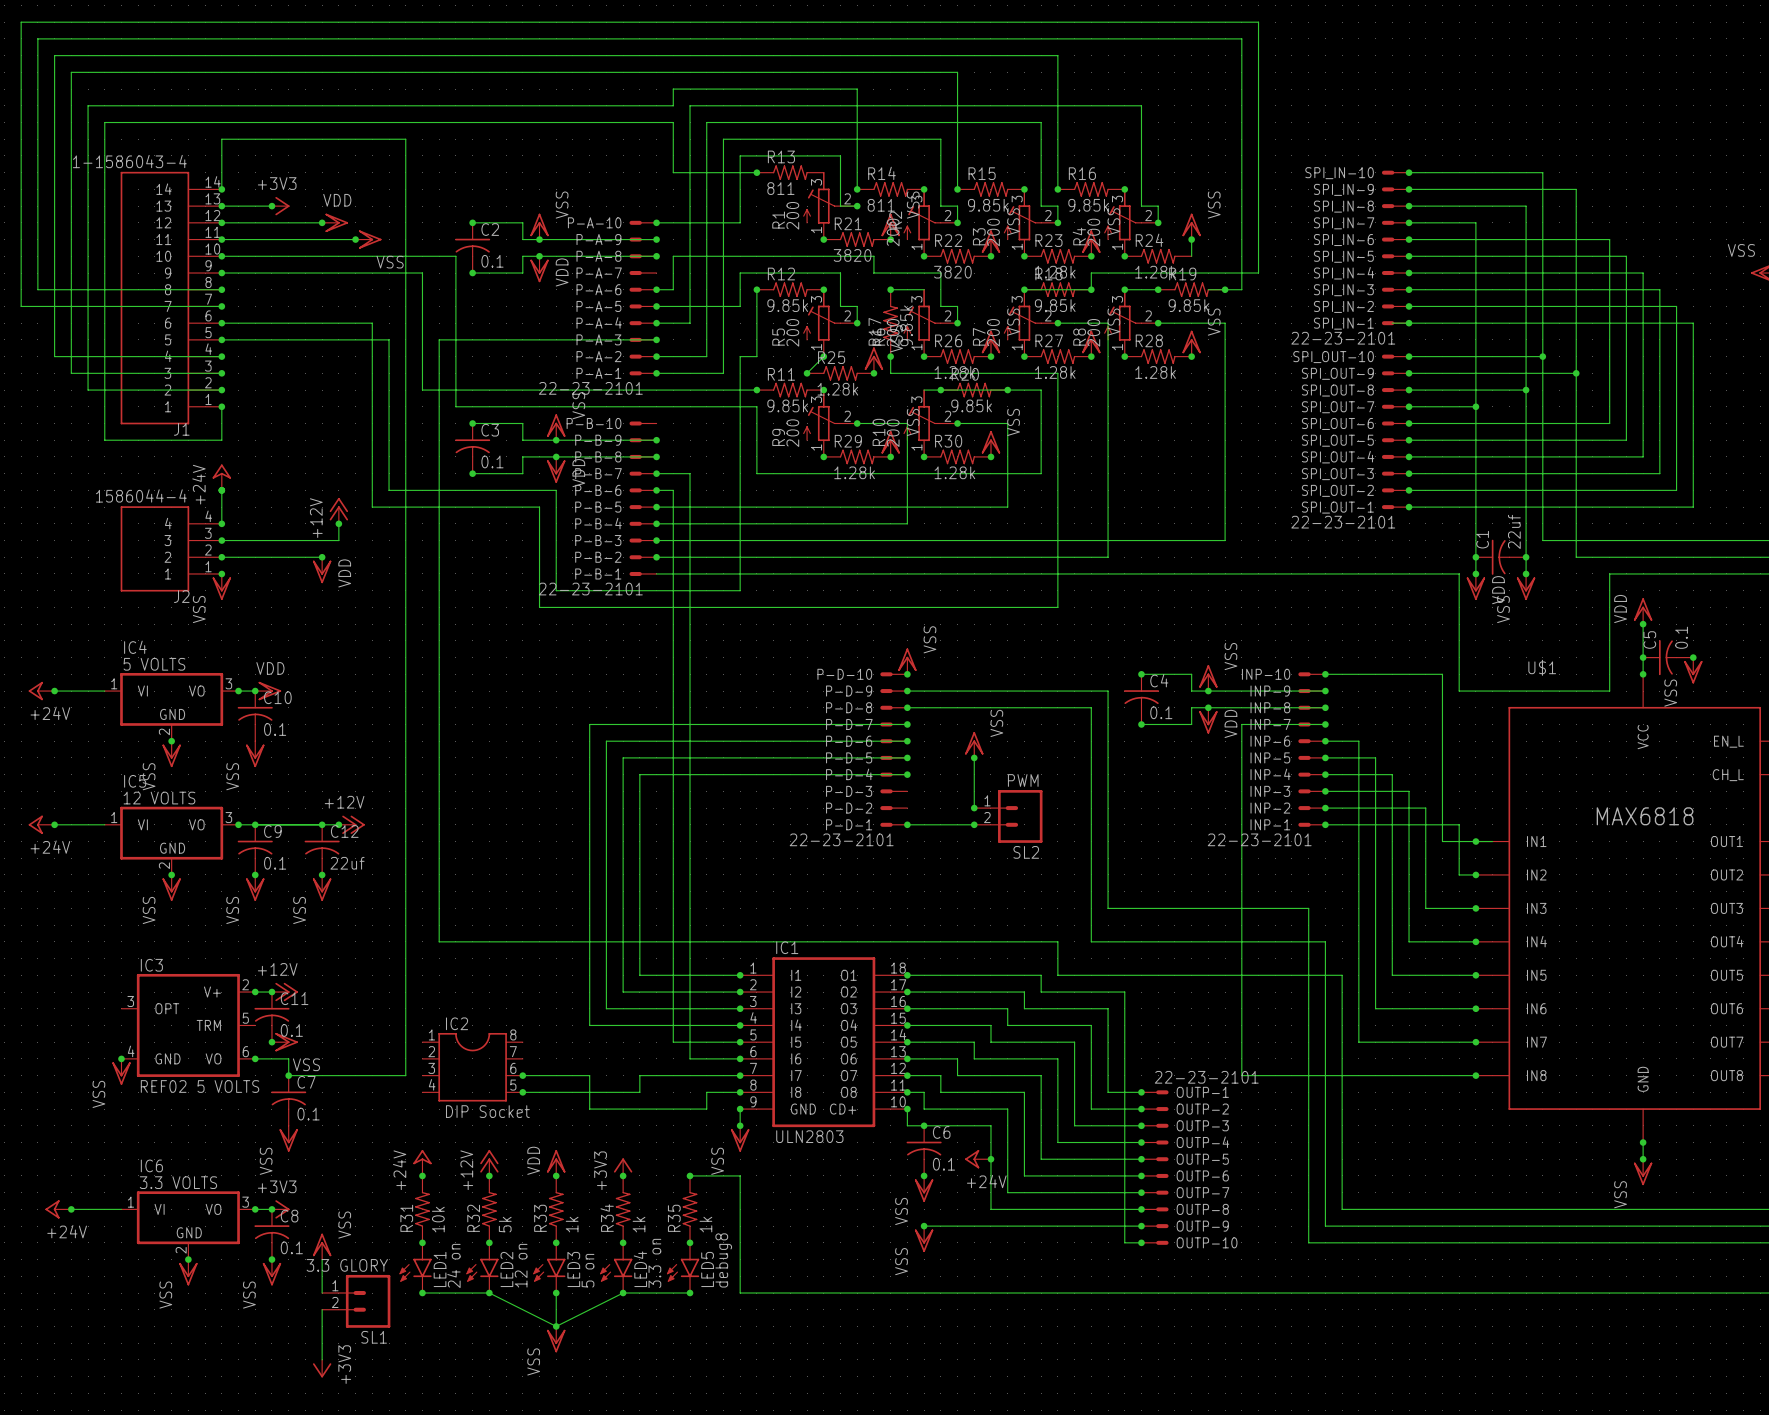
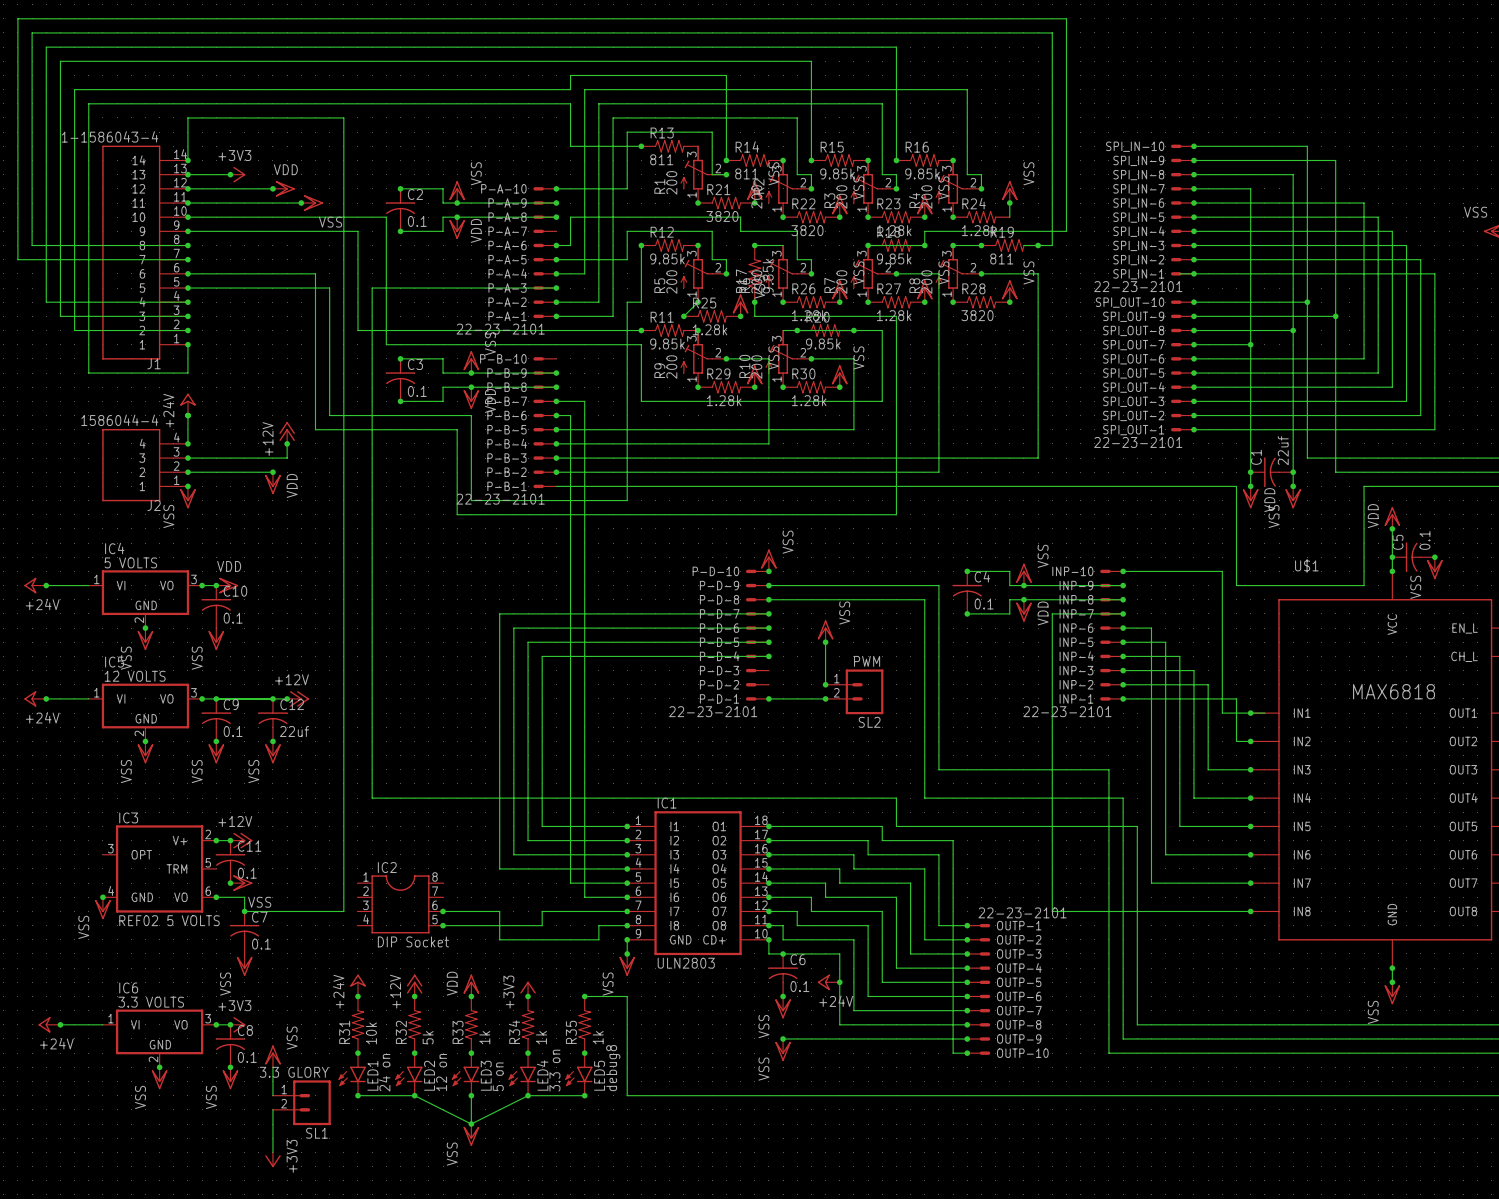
R19 value: 9.85k (1189, 305) -> 811 (1001, 258)
R28 value: 1.28k (1155, 372) -> 3820 (977, 315)

